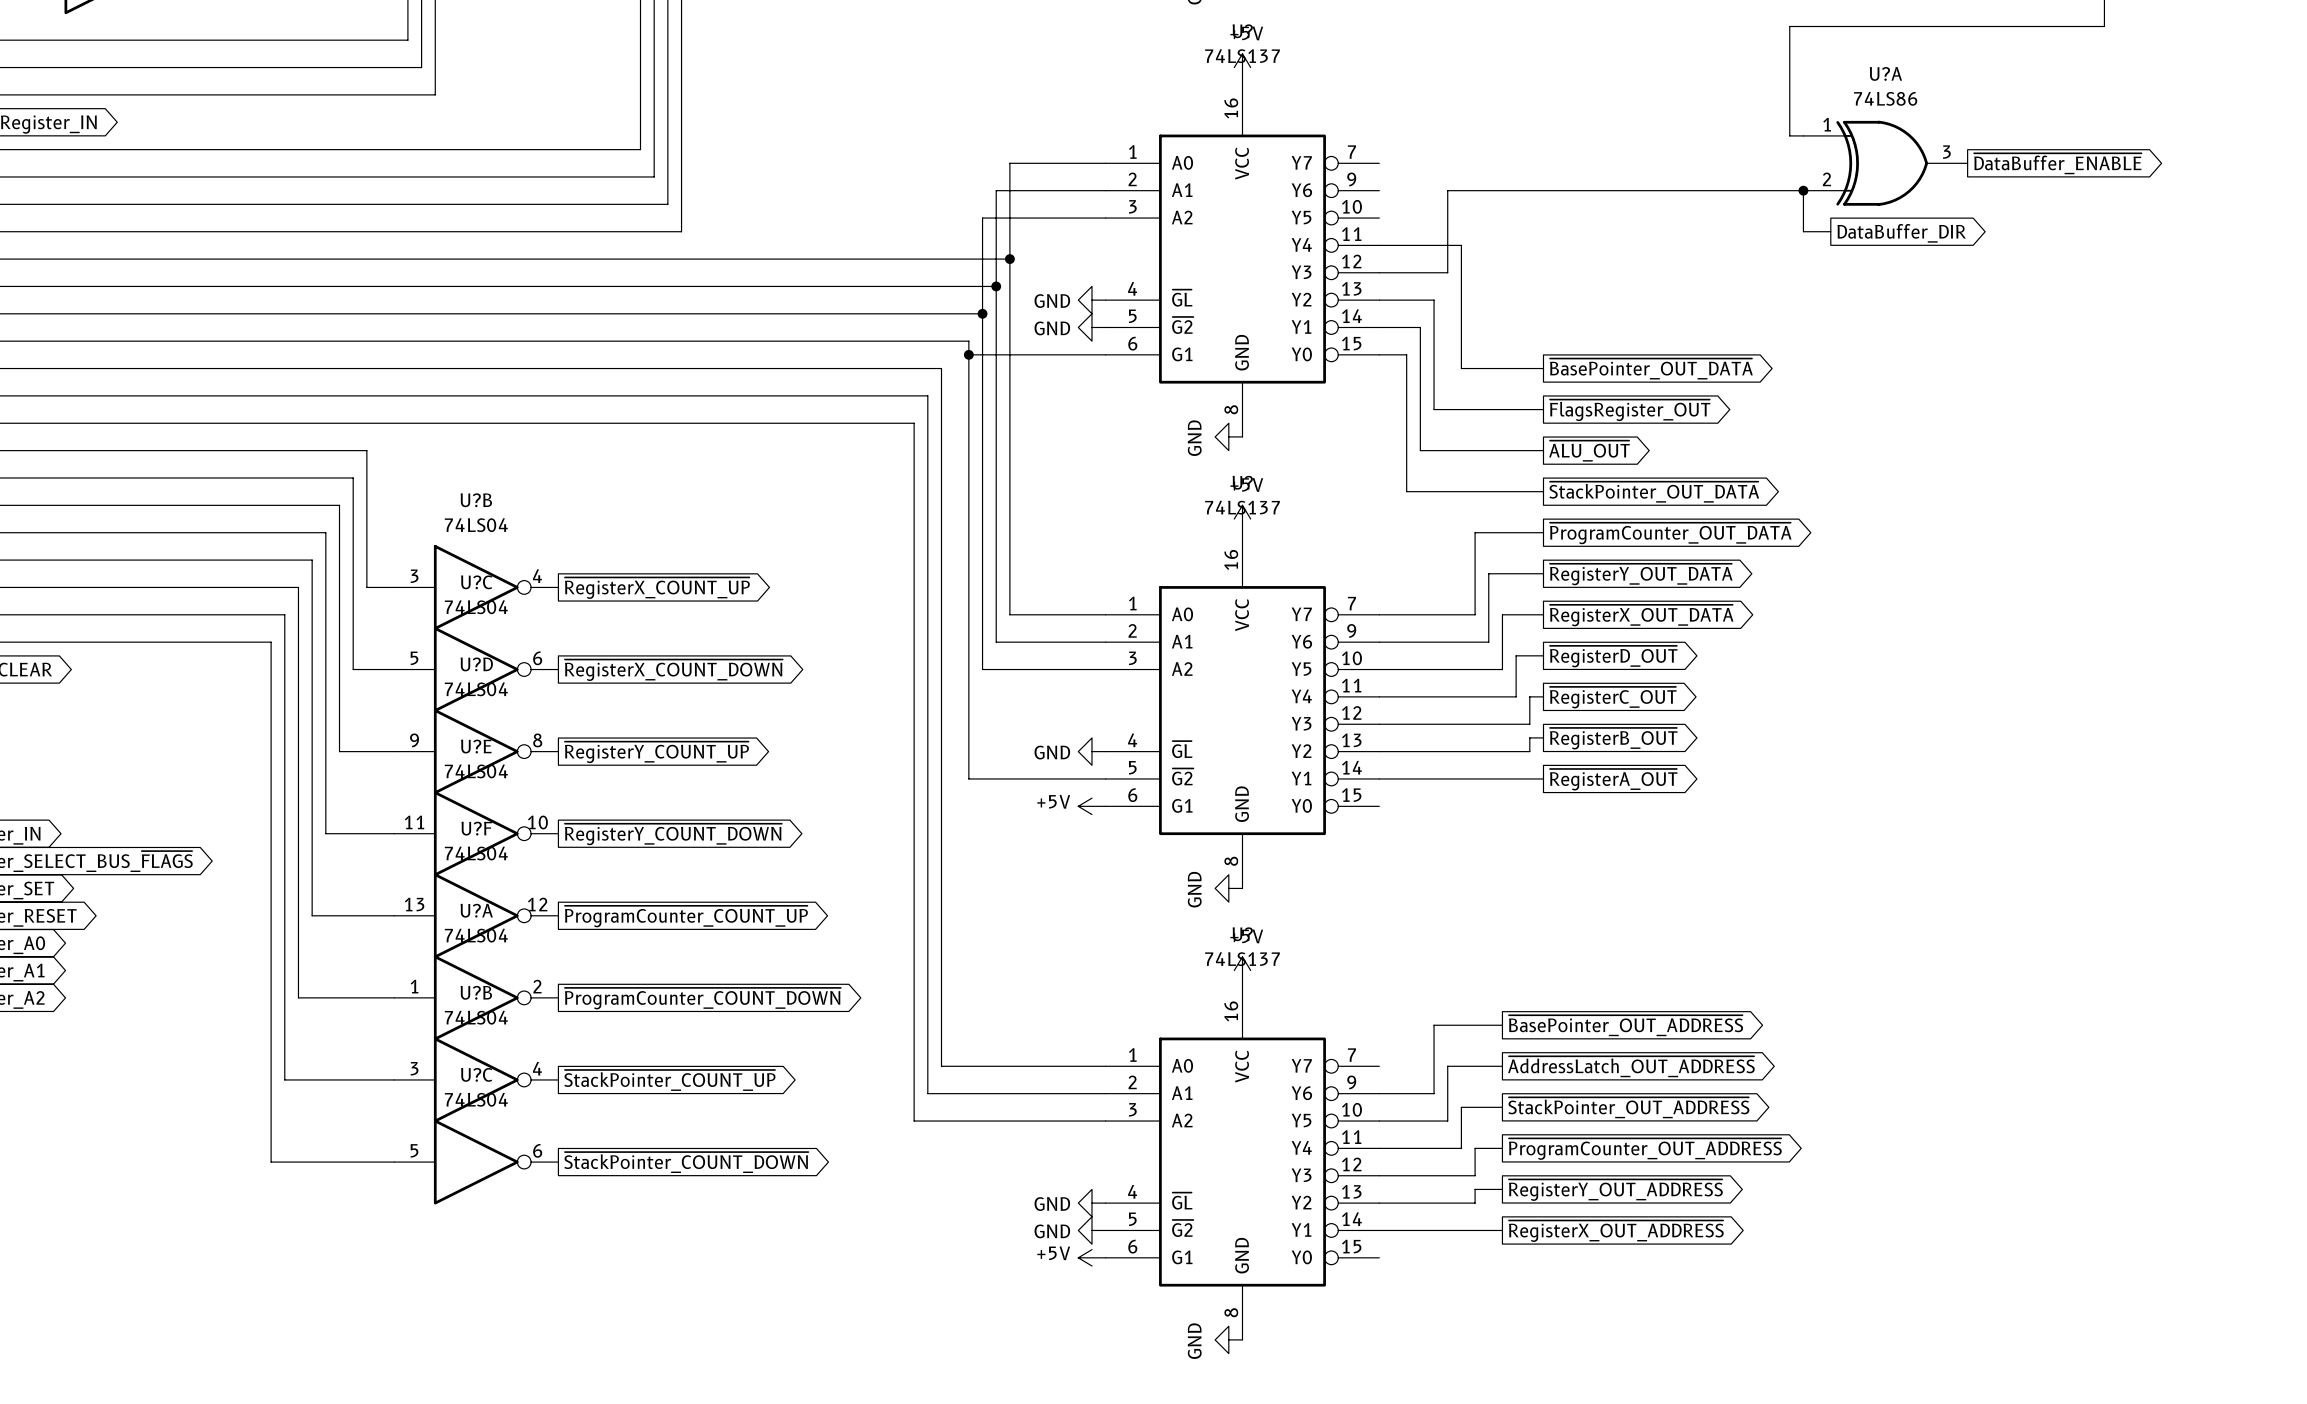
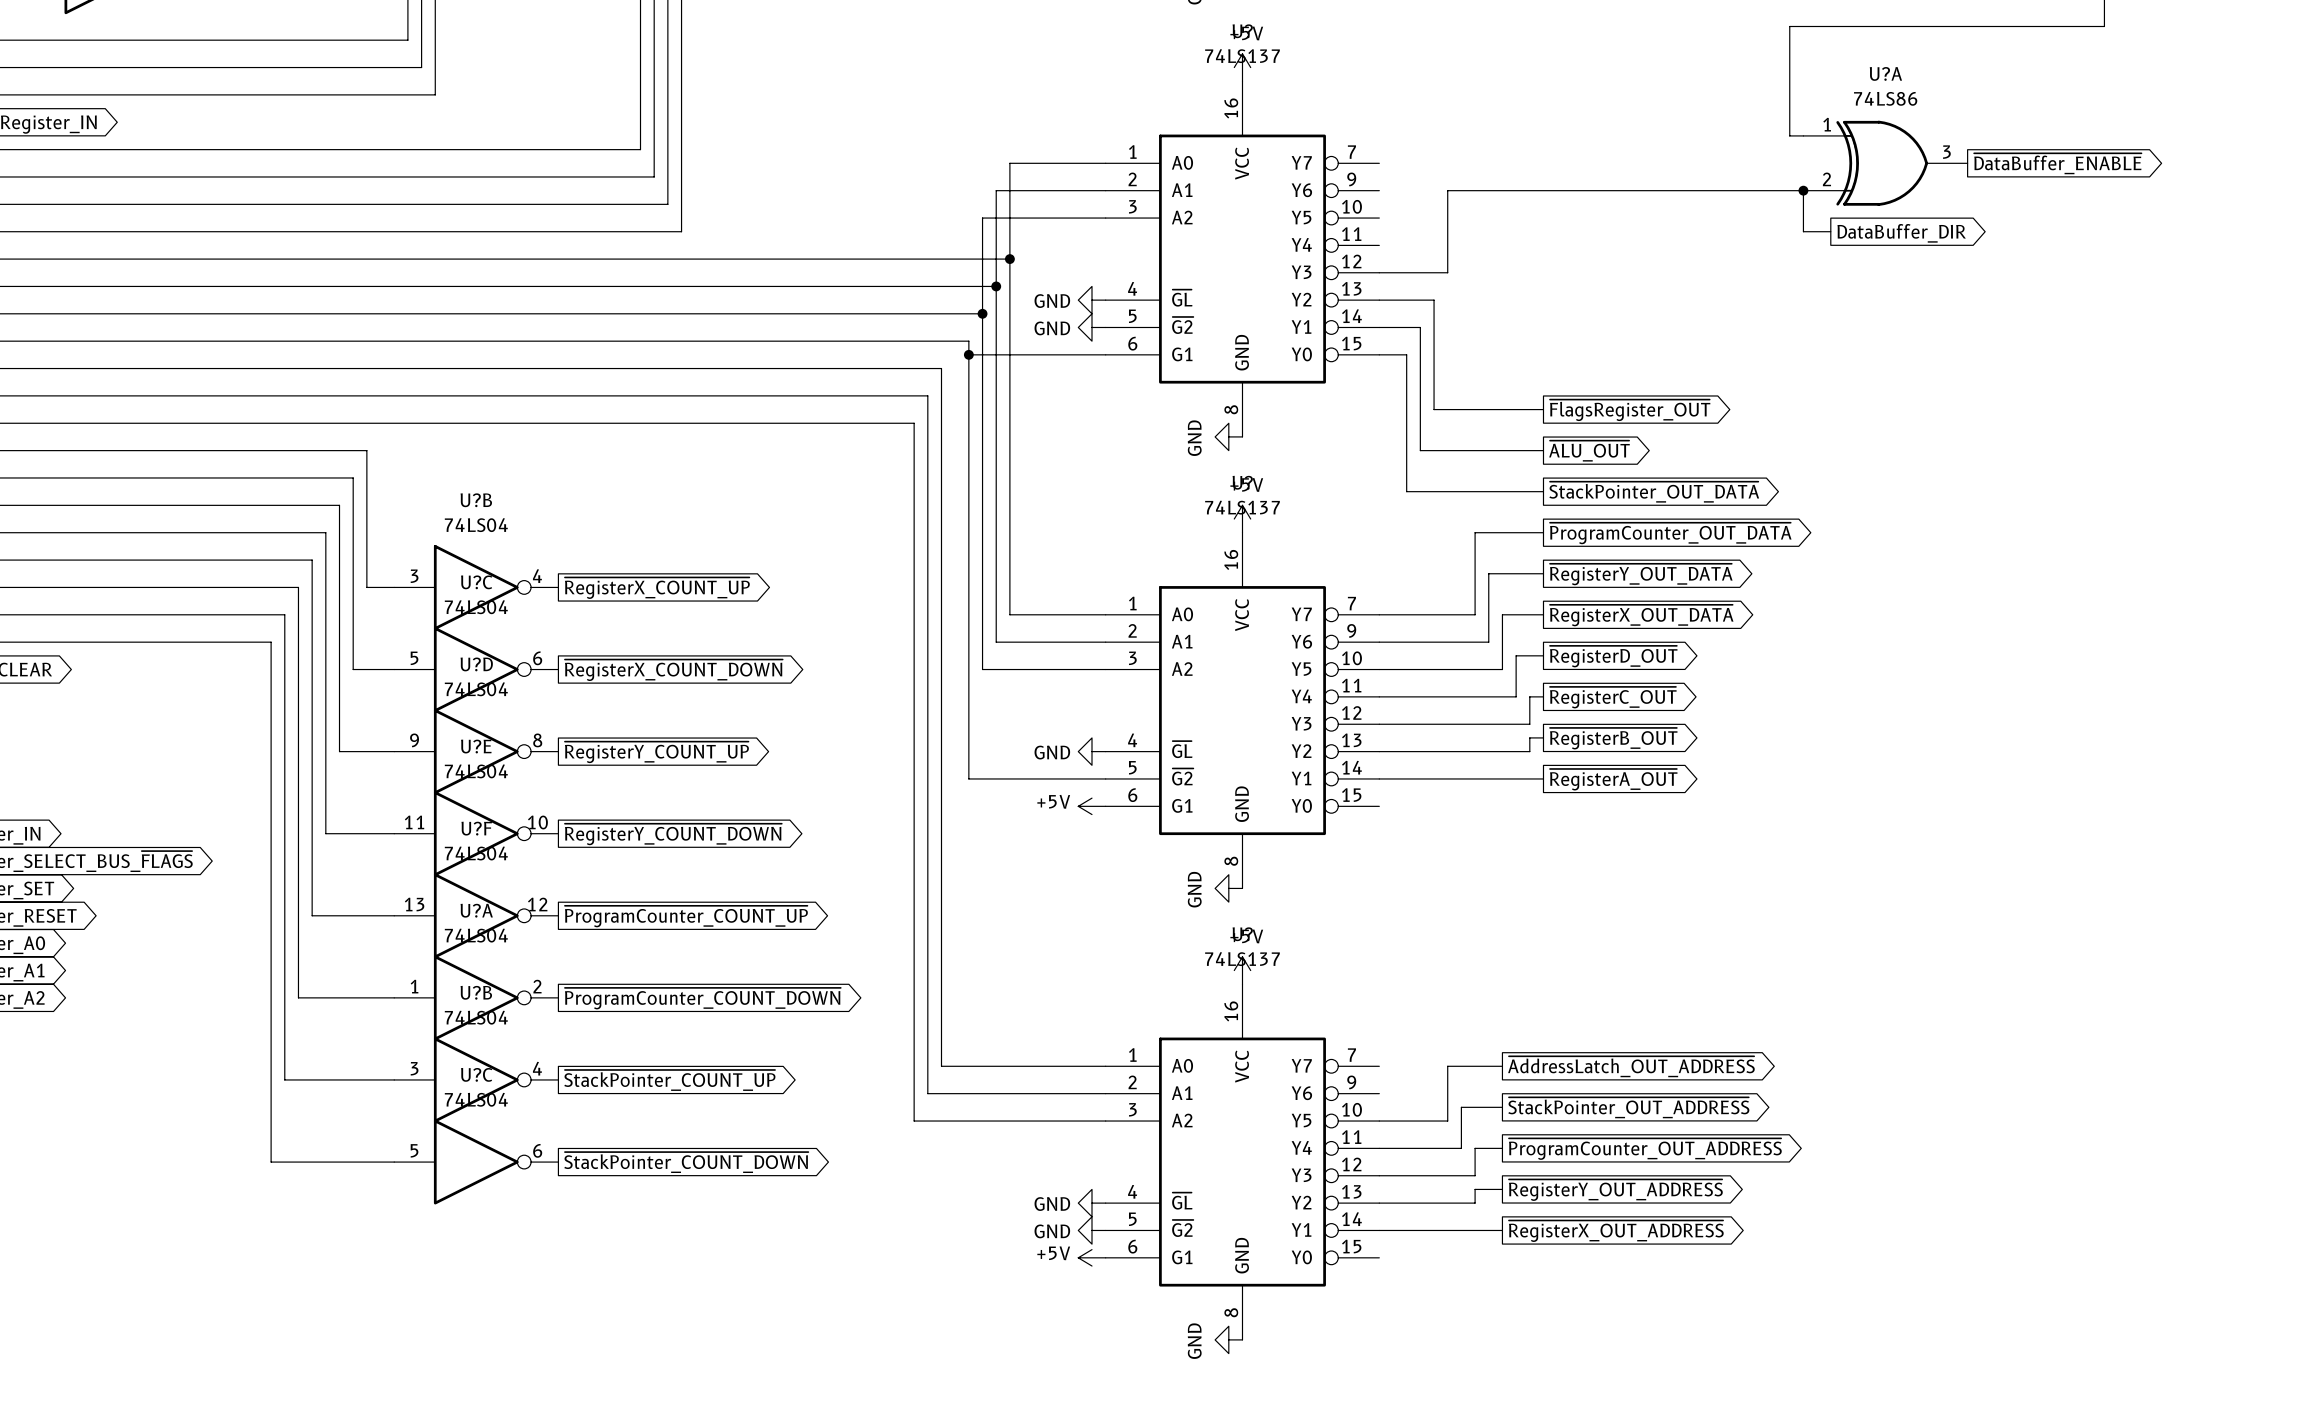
wire: (1379, 245) (1461, 245) (1461, 368) (1543, 368) -> none
global label: ~{BasePointer_OUT_DATA} (1651, 369) -> none
wire: (1502, 1025) (1434, 1025) (1434, 1093) (1379, 1093) -> none
global label: ~{BasePointer_OUT_ADDRESS} (1625, 1025) -> none

